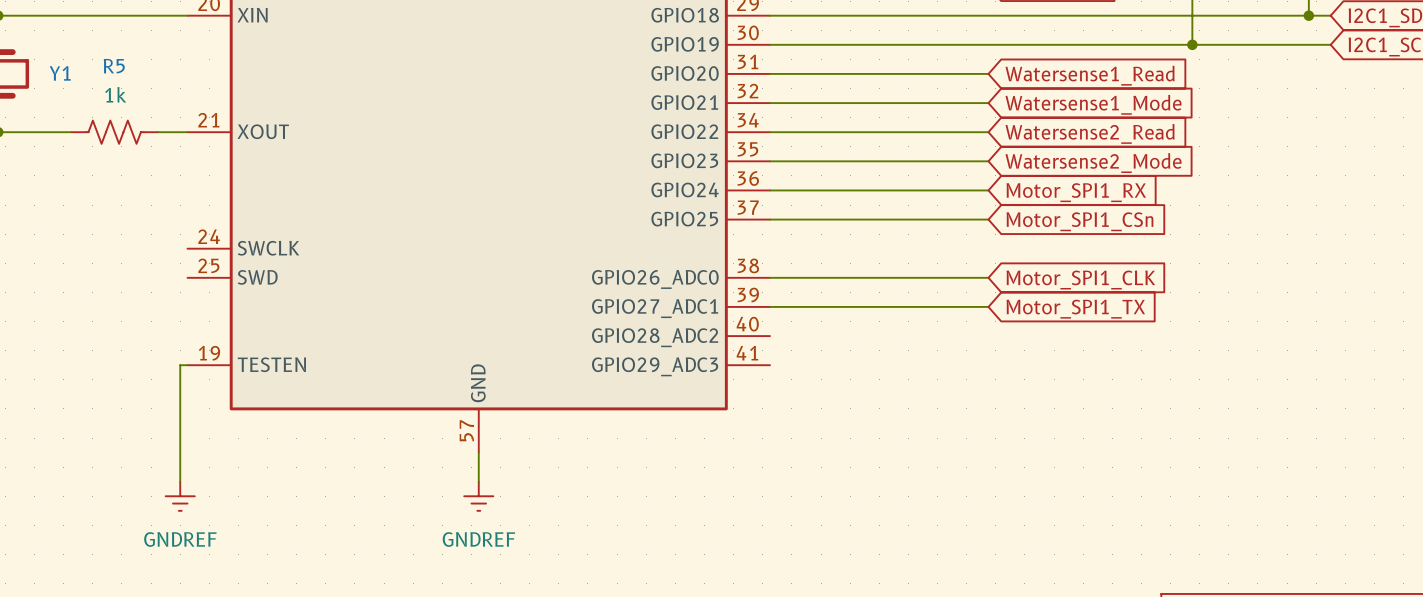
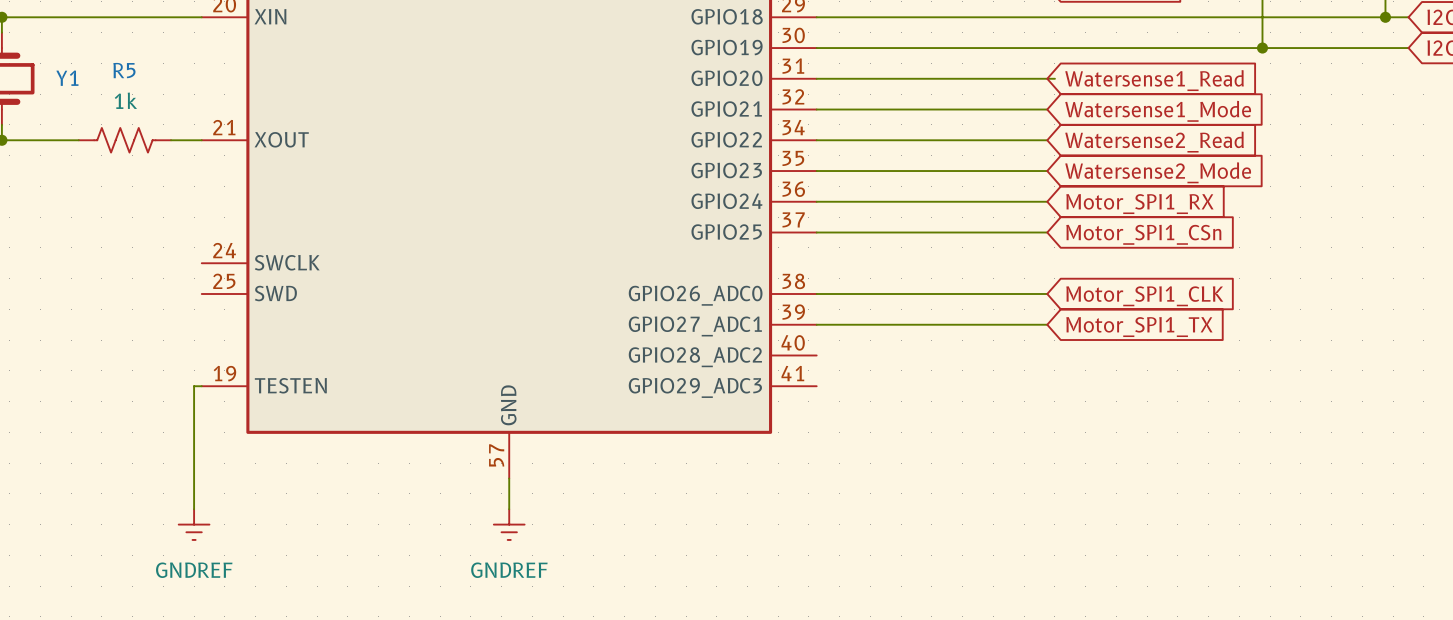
wire: none -> (1047, 78) (1054, 78)

